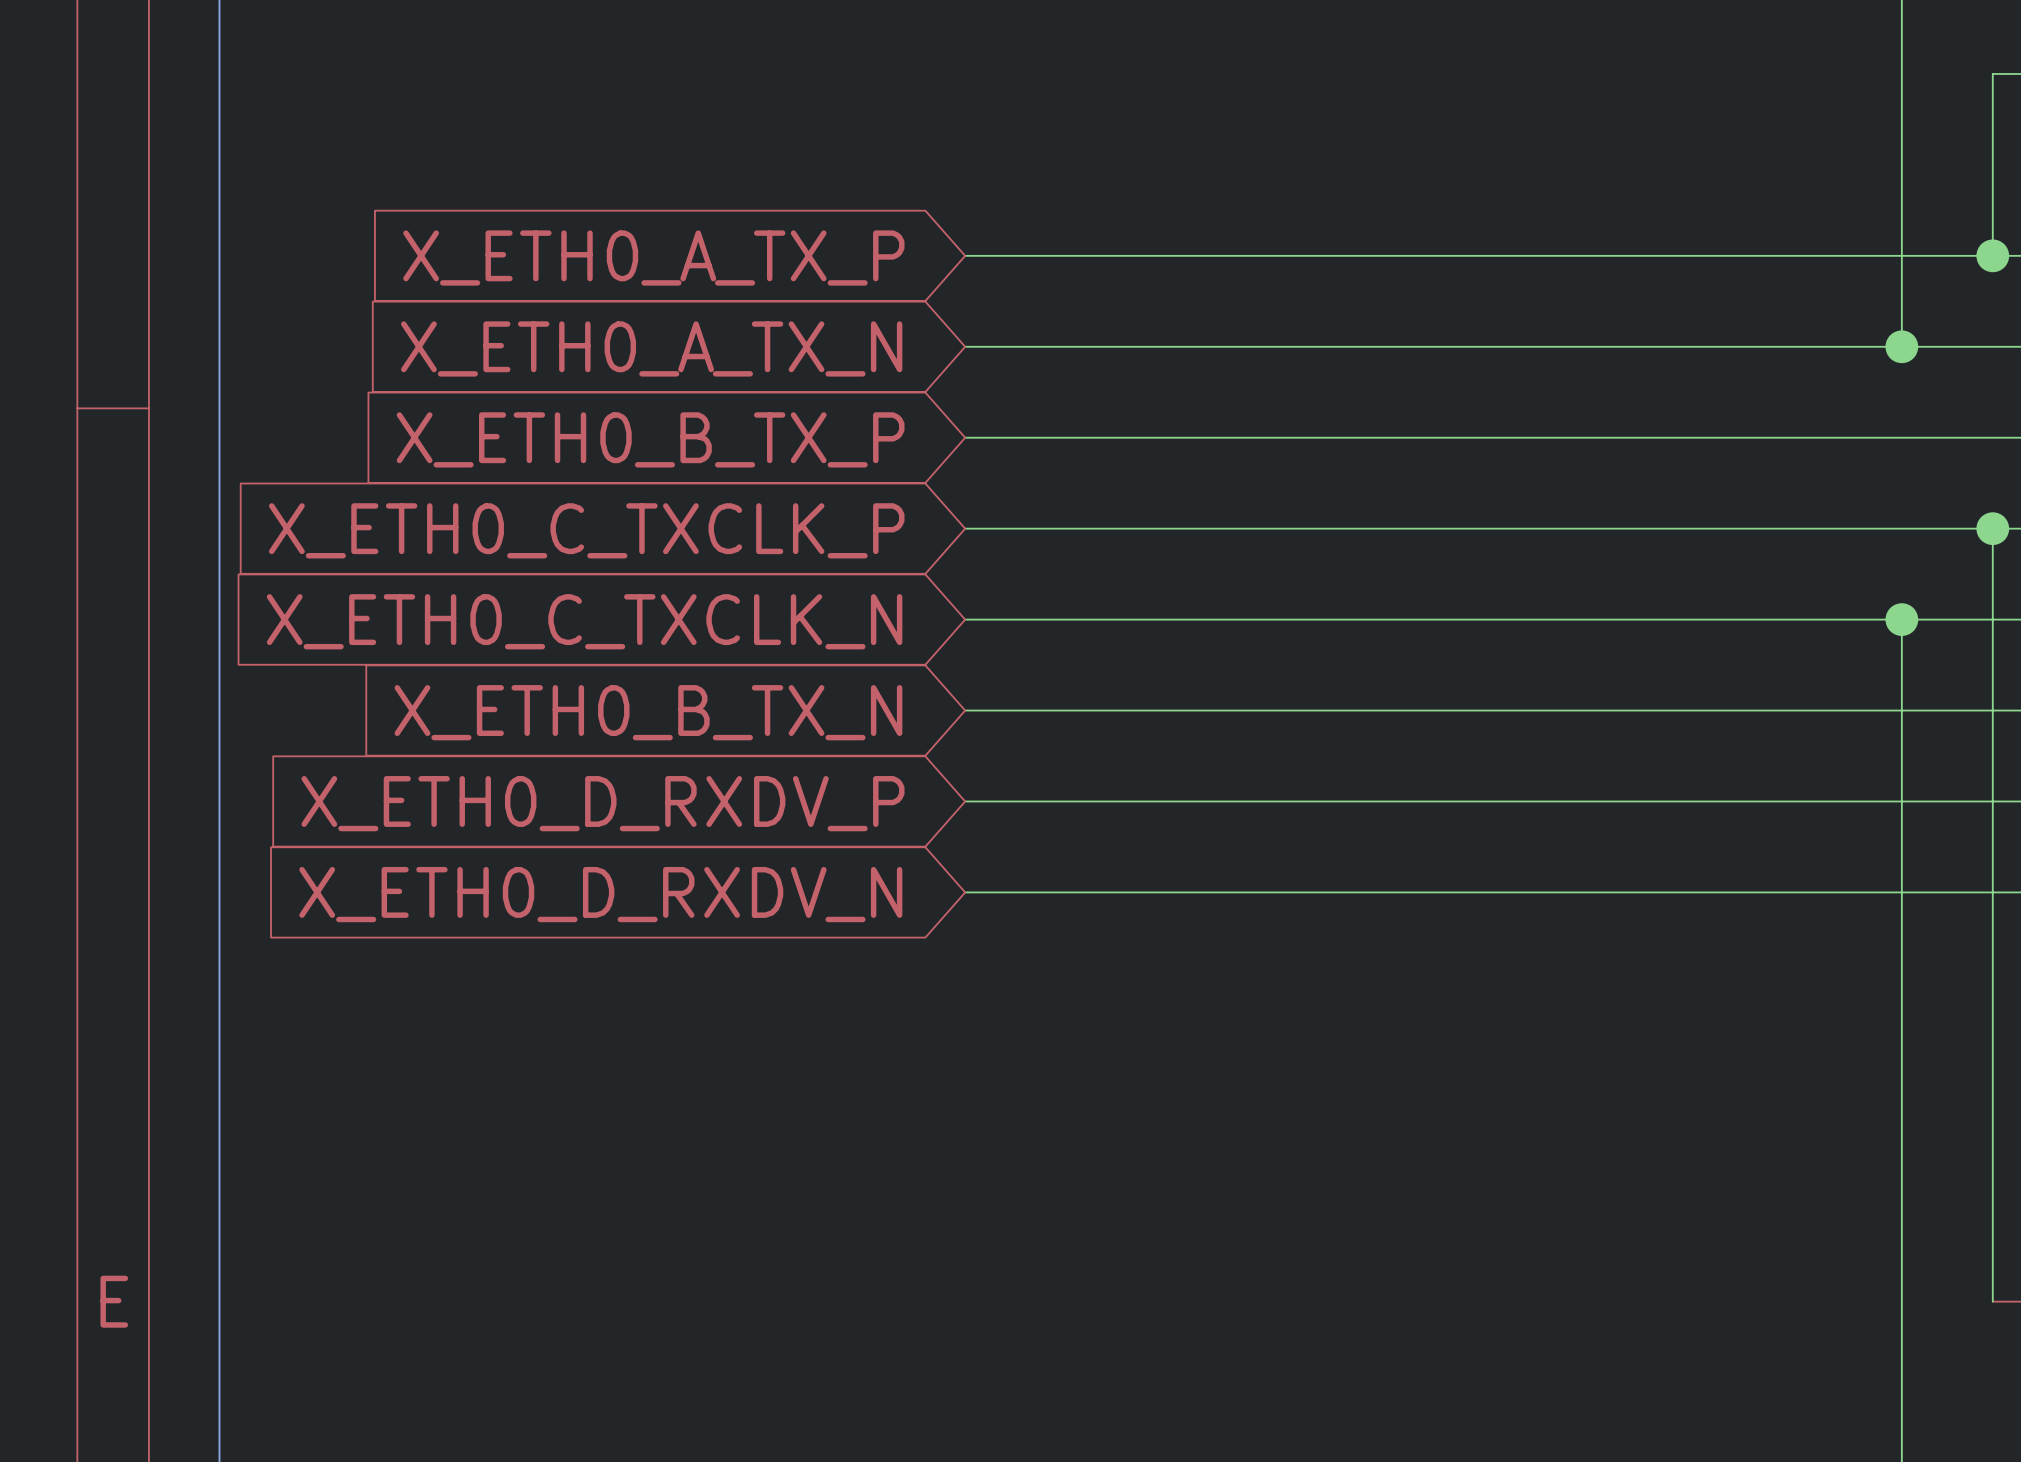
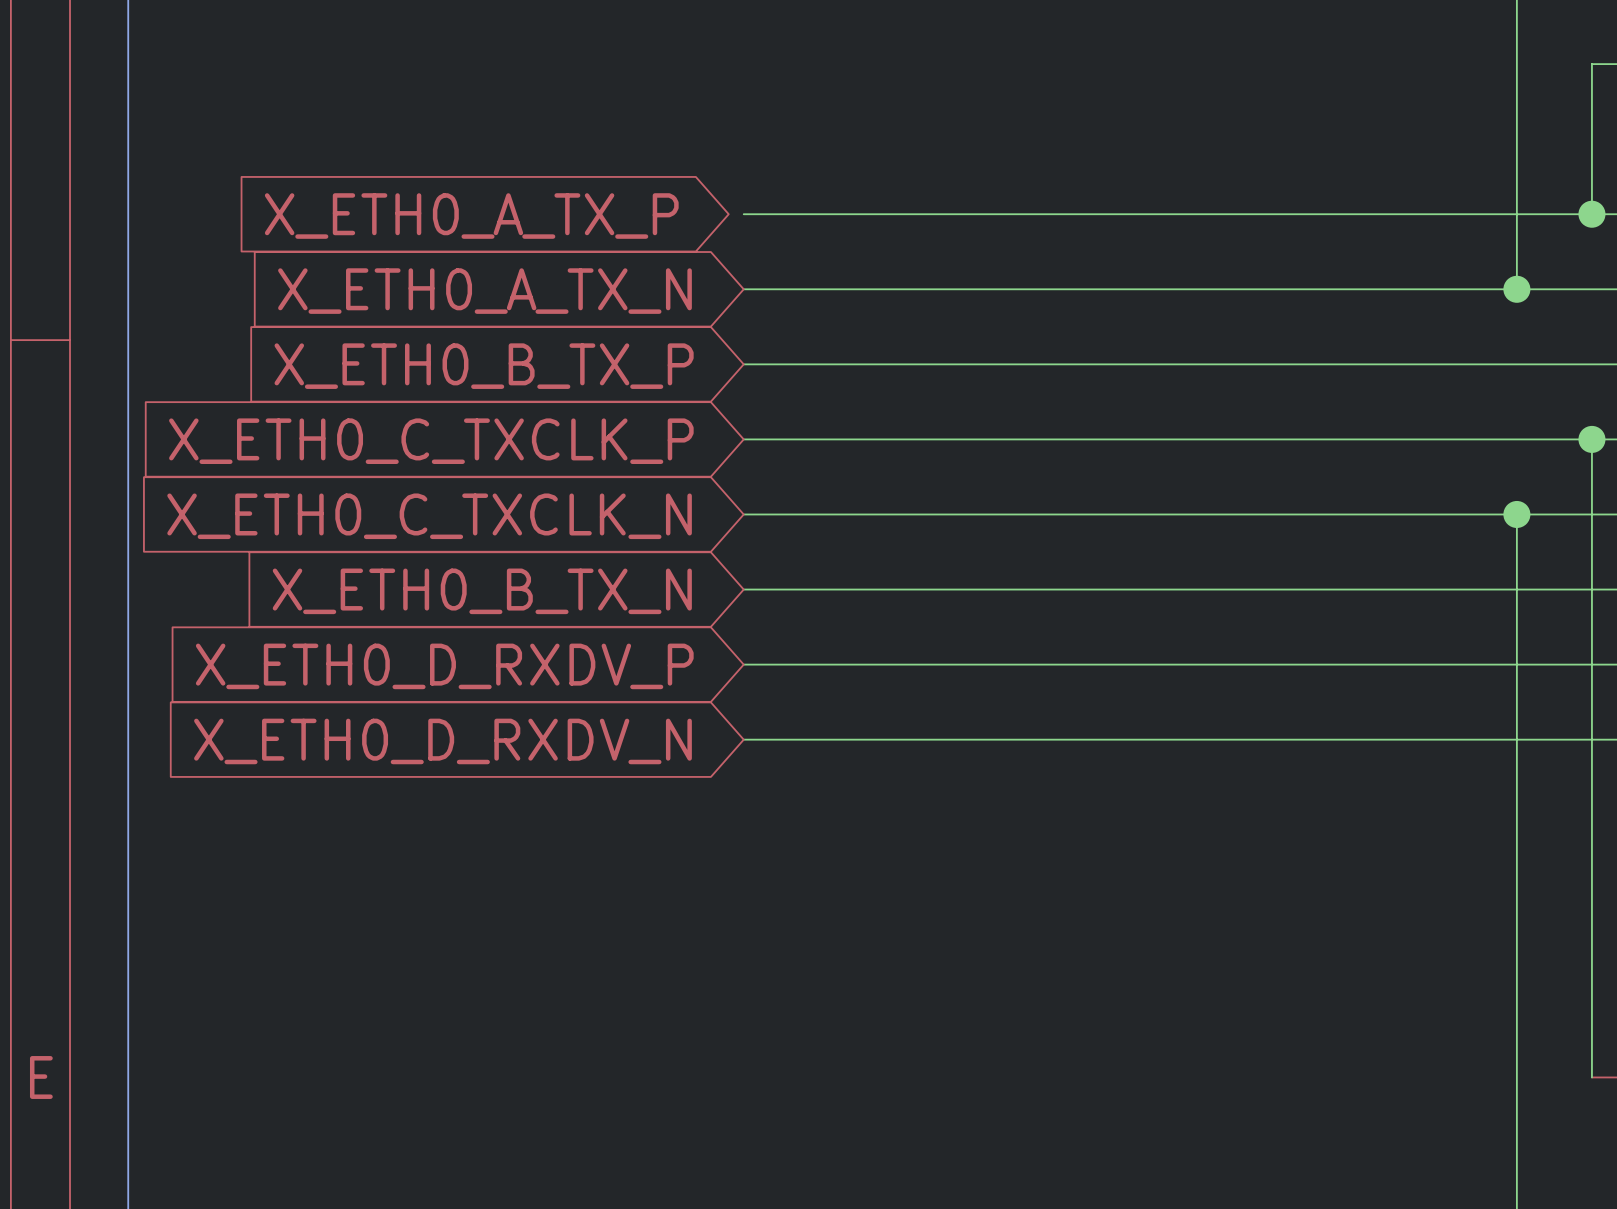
global label position: X_ETH0_A_TX_P (653, 258) -> X_ETH0_A_TX_P (471, 216)

